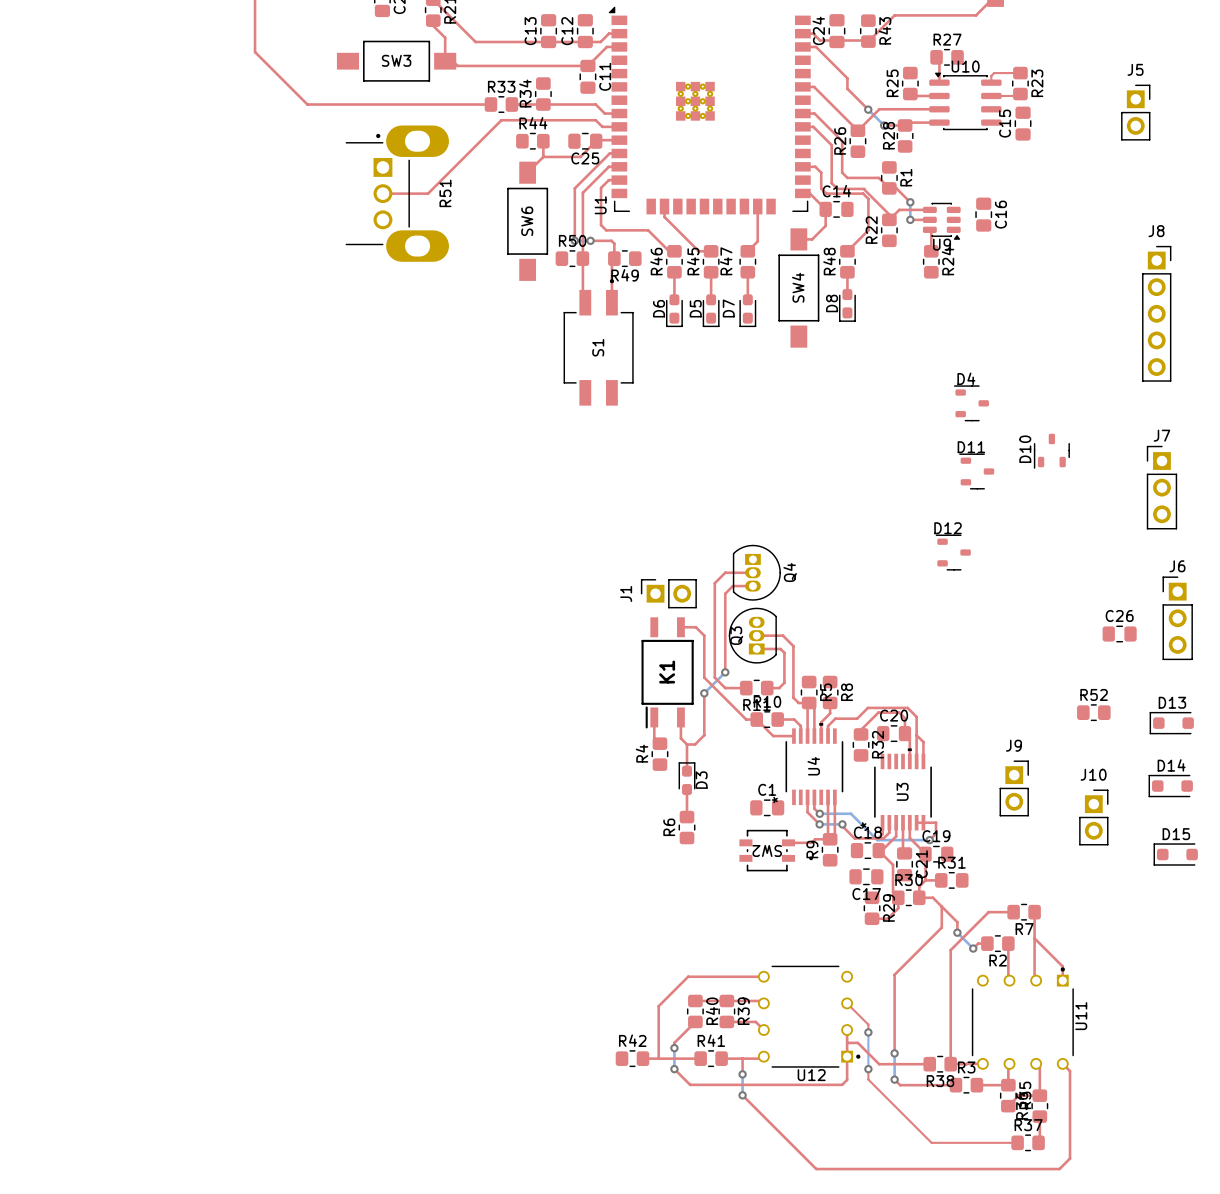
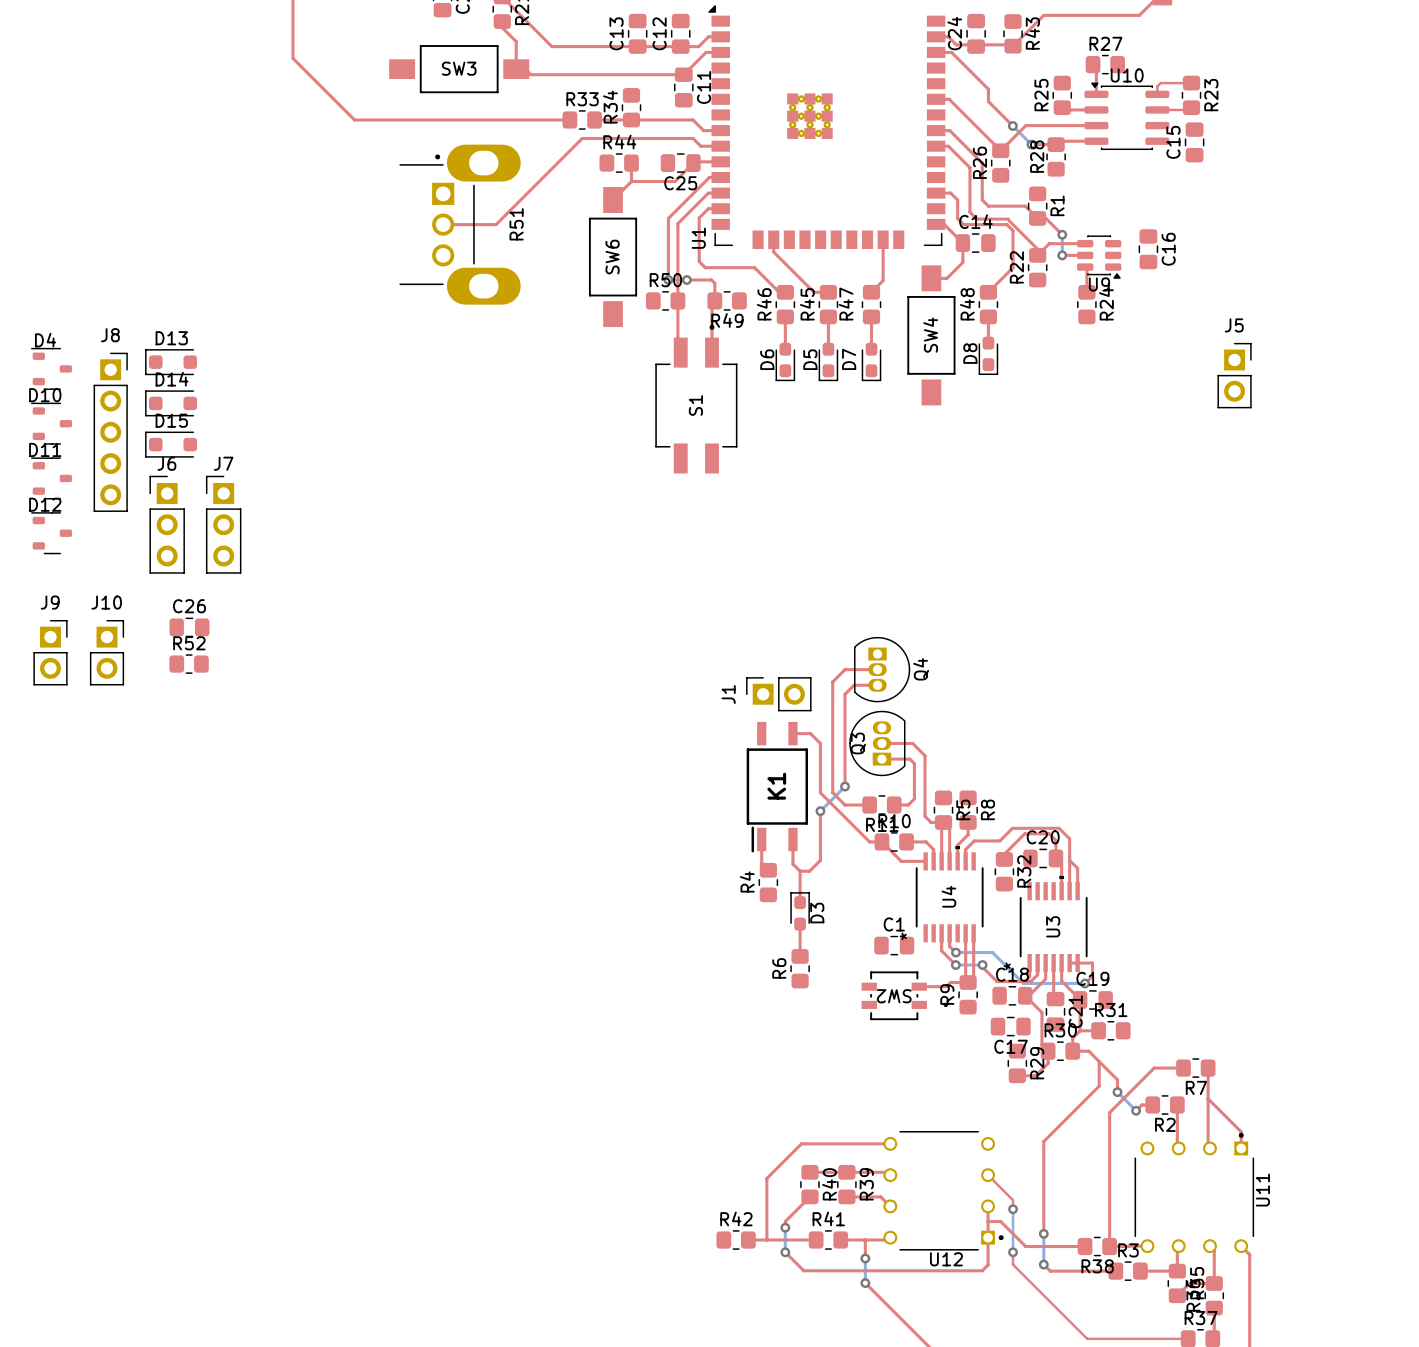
J5 position: (1135, 112) -> (1234, 375)
J8 position: (1156, 313) -> (110, 432)
D4 position: (971, 403) -> (51, 368)
D10 rotation: 0° (1051, 451) -> 90° clockwise (51, 423)
D10 position: (1051, 451) -> (51, 423)
D11 position: (976, 471) -> (51, 478)
J7 position: (1161, 487) -> (223, 524)
D12 position: (953, 552) -> (51, 533)
J6 position: (1177, 618) -> (167, 524)
C26 position: (1119, 634) -> (189, 627)
R52 position: (1093, 712) -> (189, 664)
D13 position: (1171, 723) -> (171, 362)
D14 position: (1170, 786) -> (171, 403)
J9 position: (1014, 788) -> (50, 652)
J10 position: (1093, 817) -> (107, 652)
D15 position: (1175, 854) -> (171, 444)

